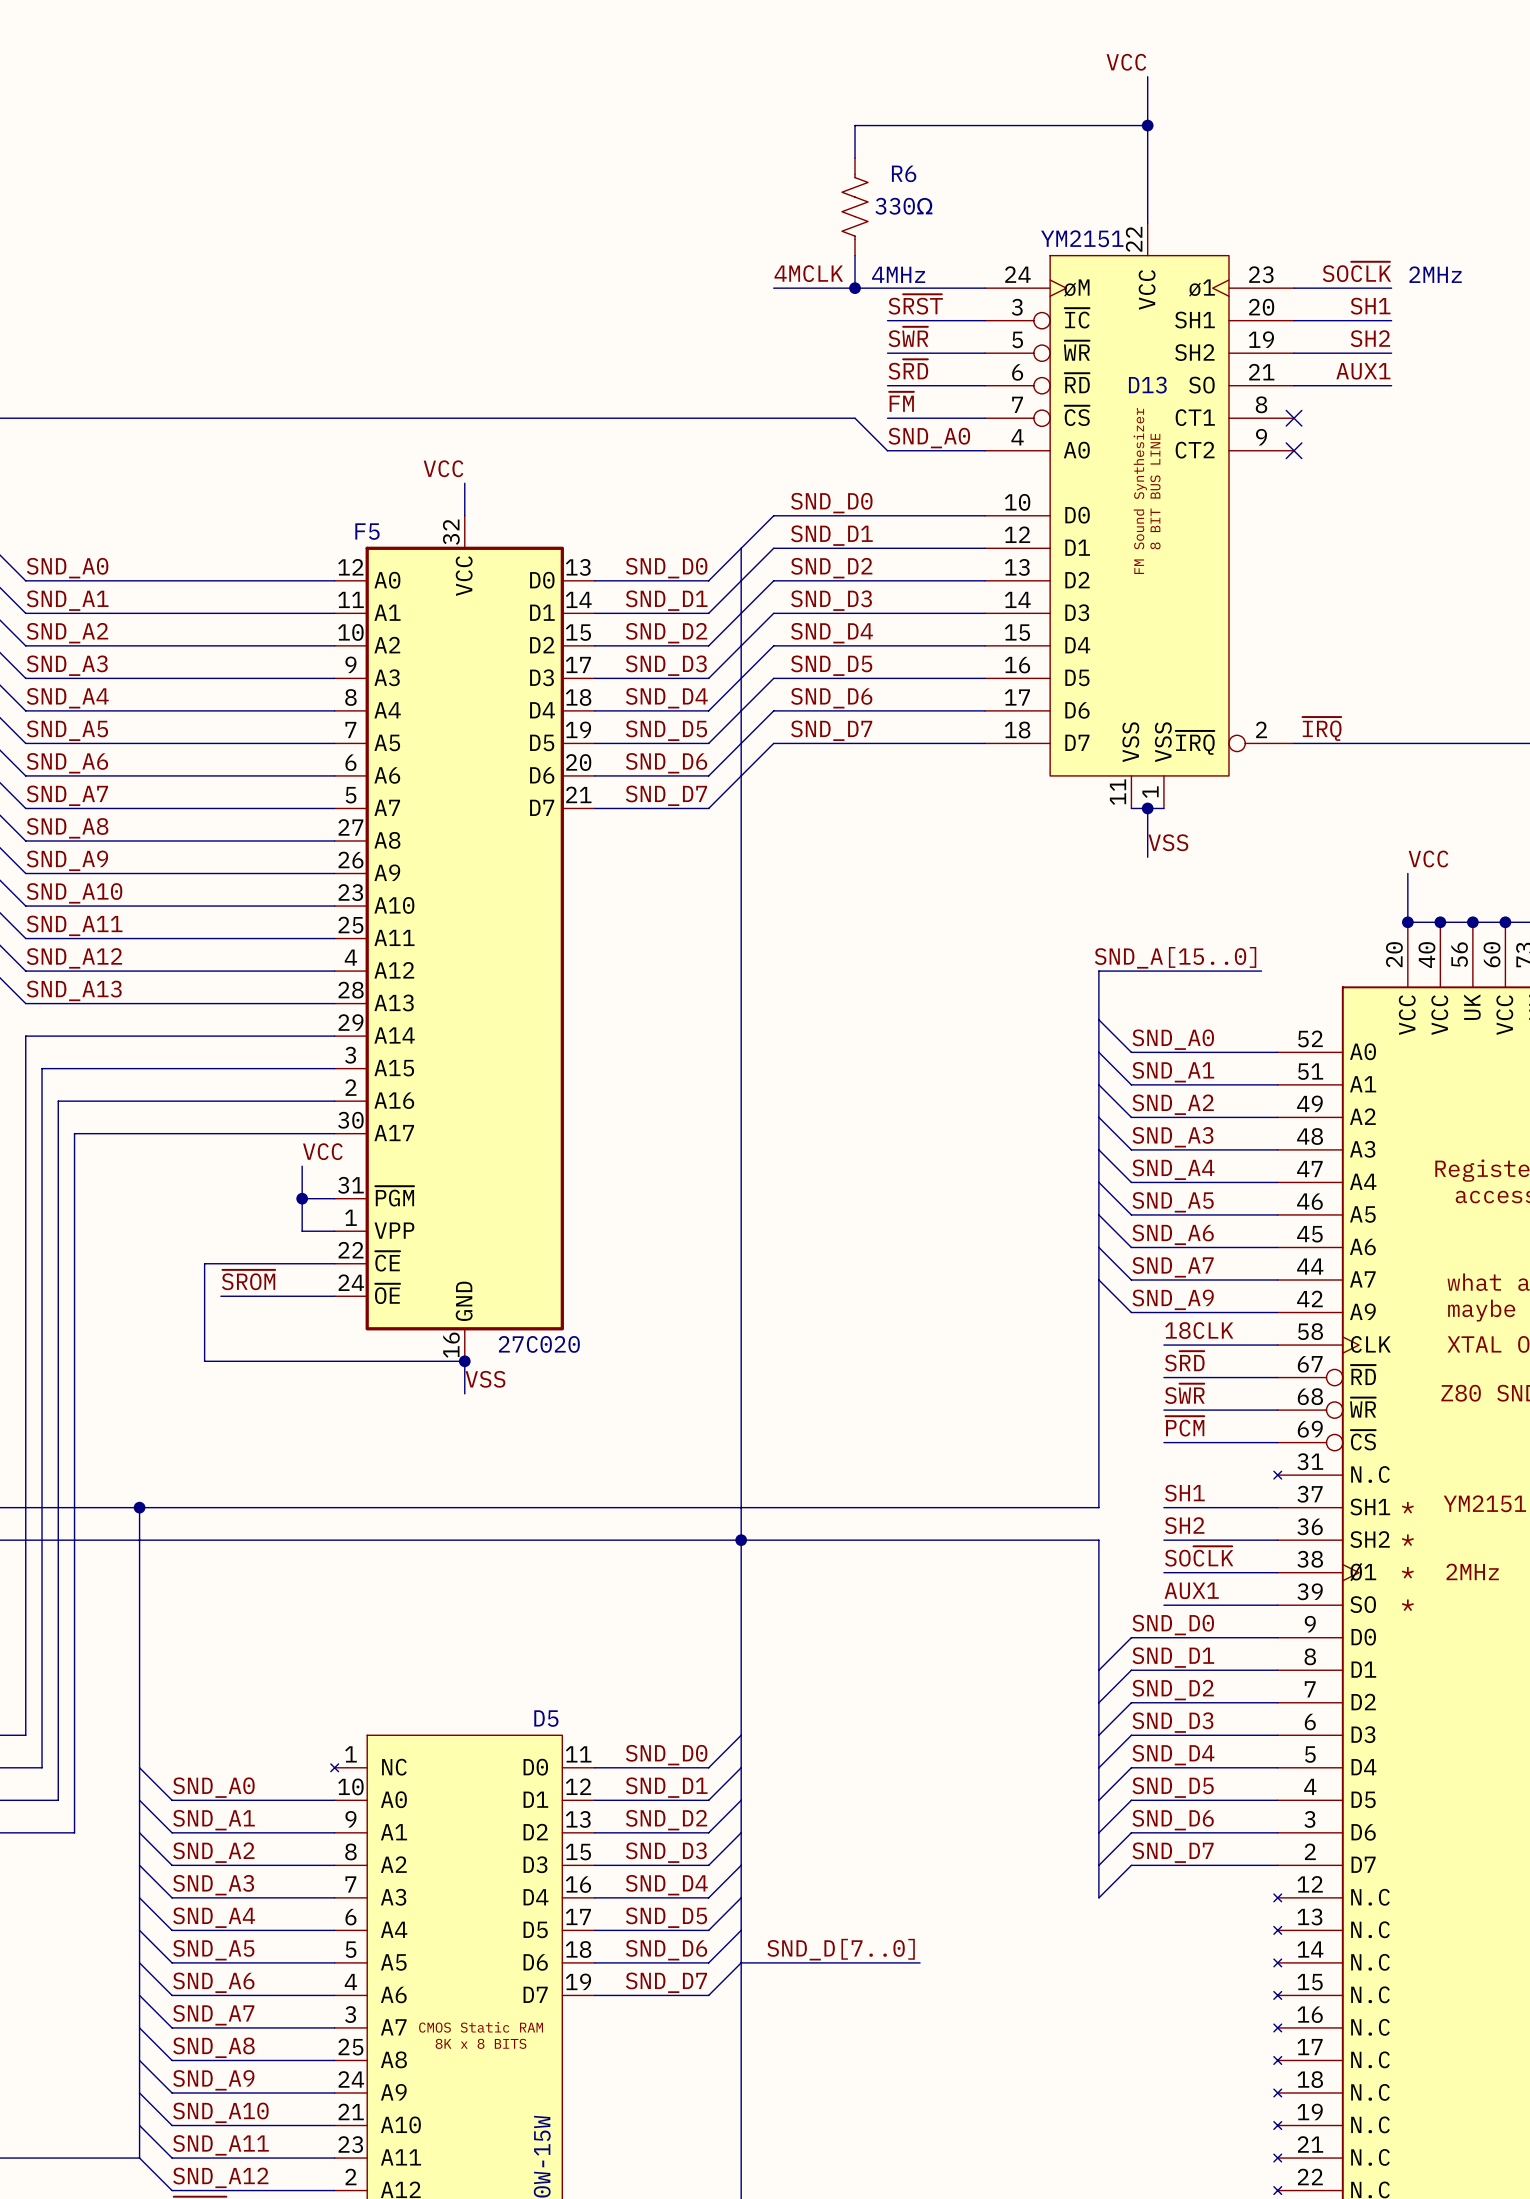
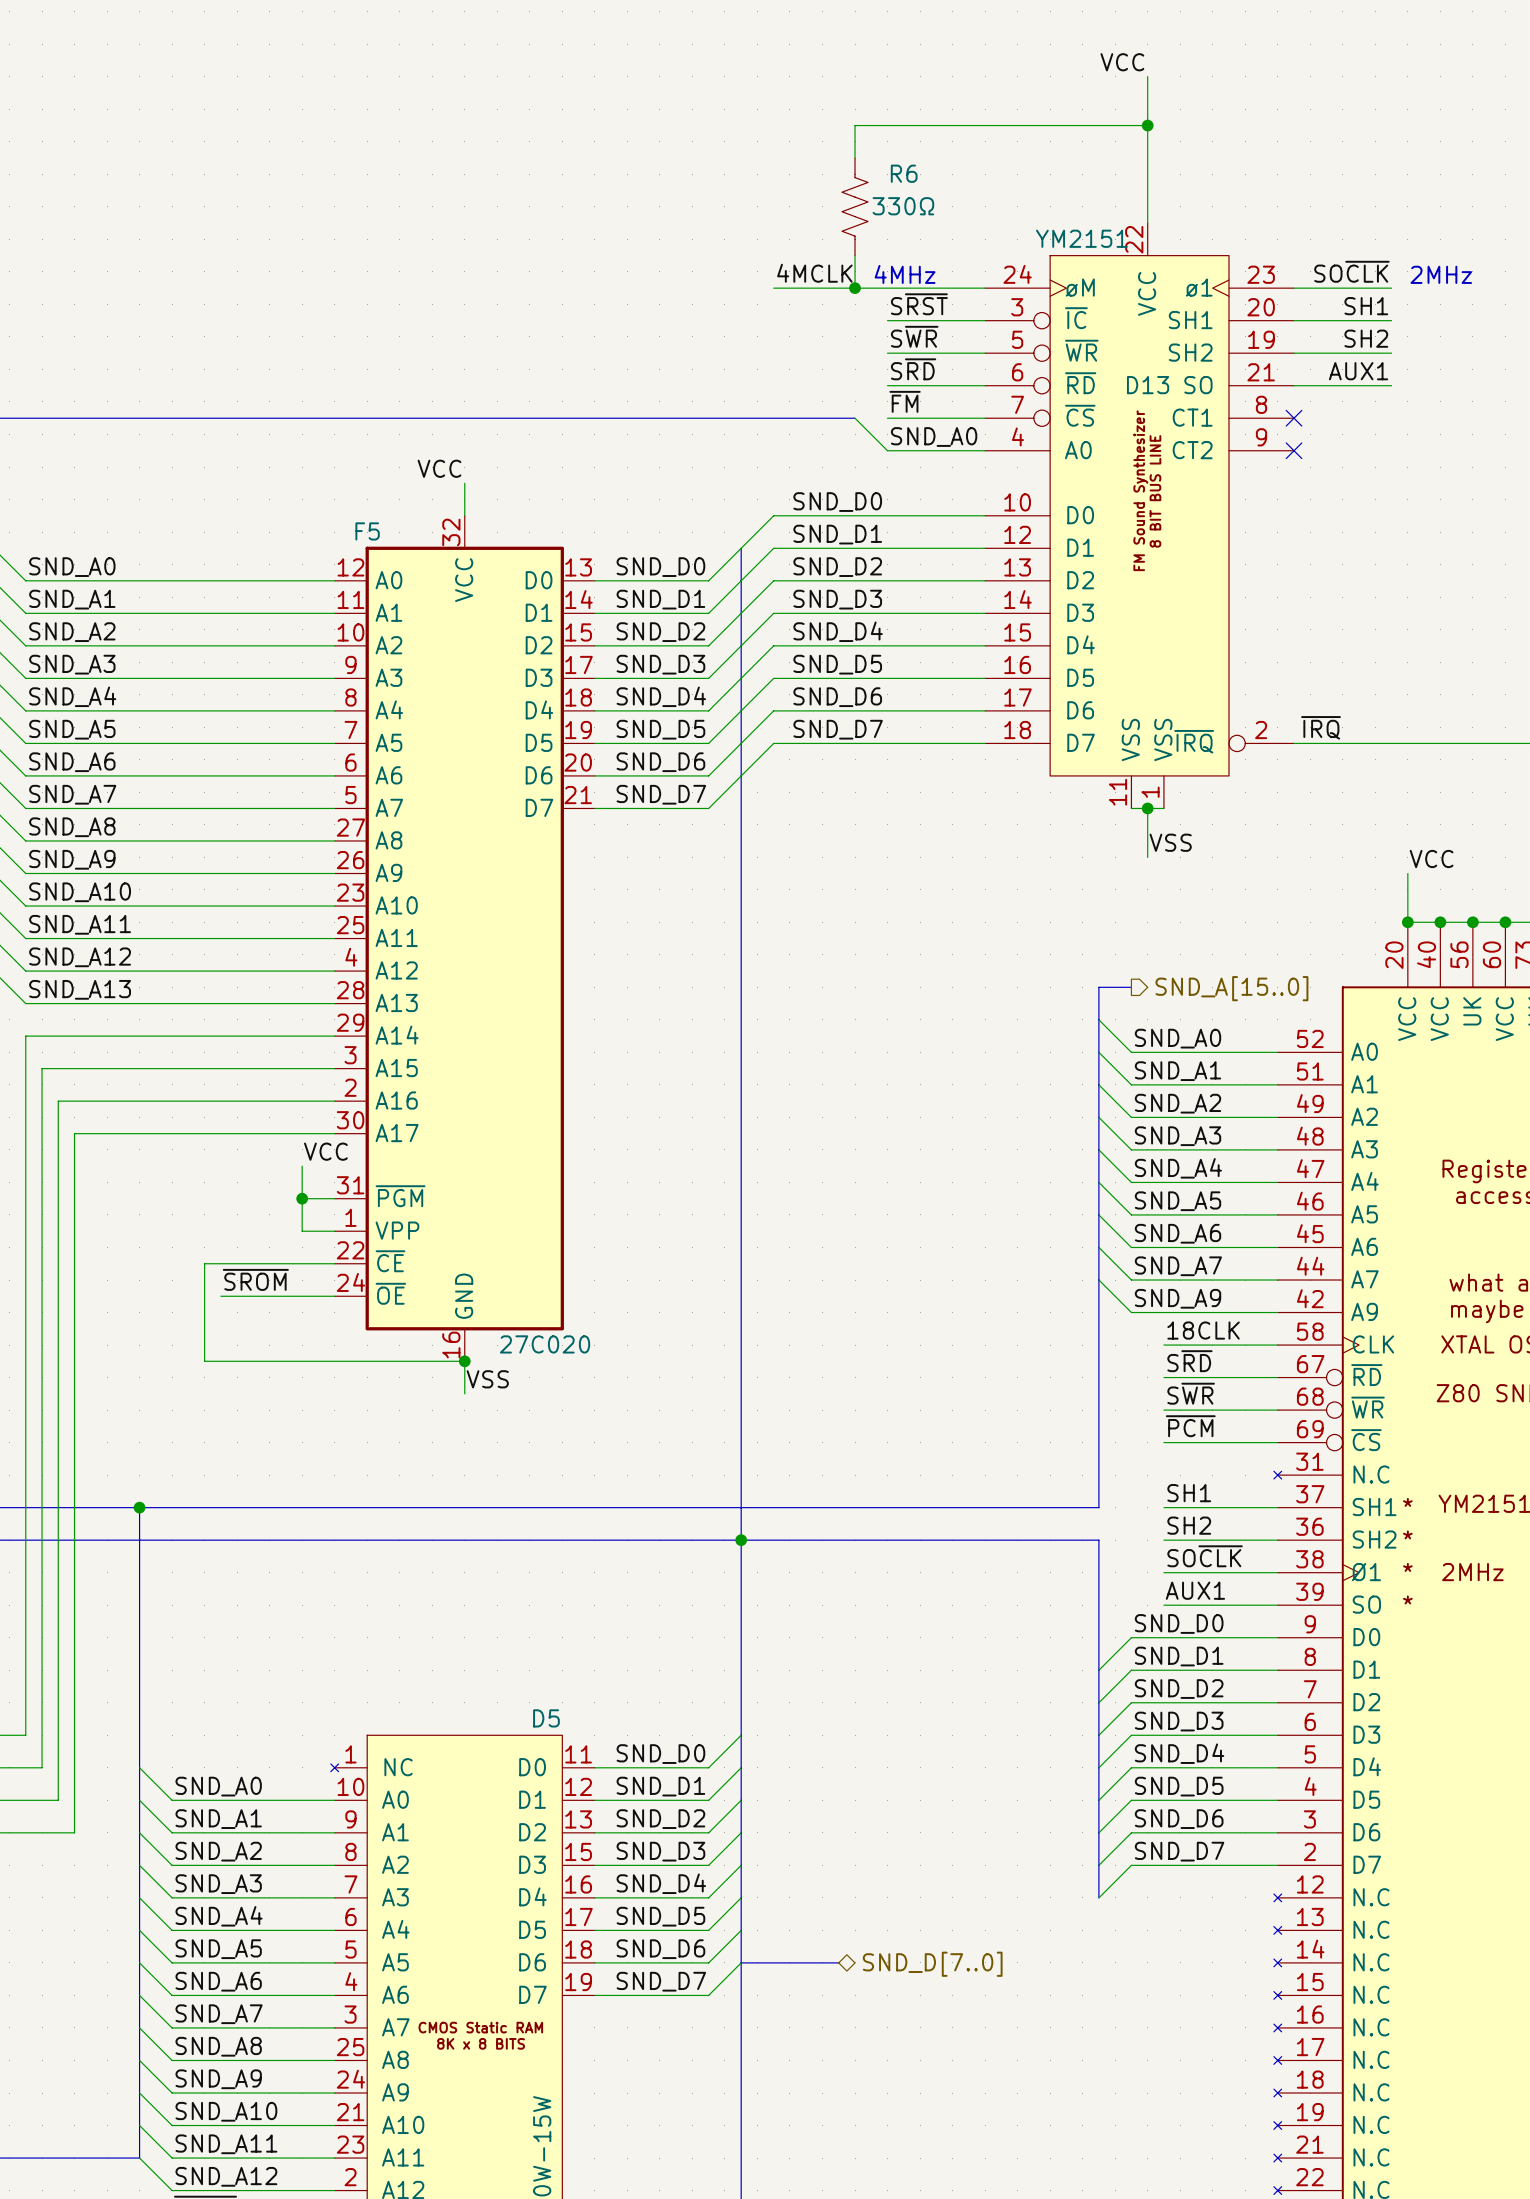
label: SND_A[15..0] (1175, 957) -> none
bus: (1261, 971) (1098, 971) (1098, 987) -> (1131, 987) (1098, 987)
hierarchical label: none -> SND_A[15..0] (1231, 988)
label: SND_D[7..0] (841, 1949) -> none
bus: (838, 1962) (920, 1962) -> none
hierarchical label: none -> SND_D[7..0] (932, 1964)

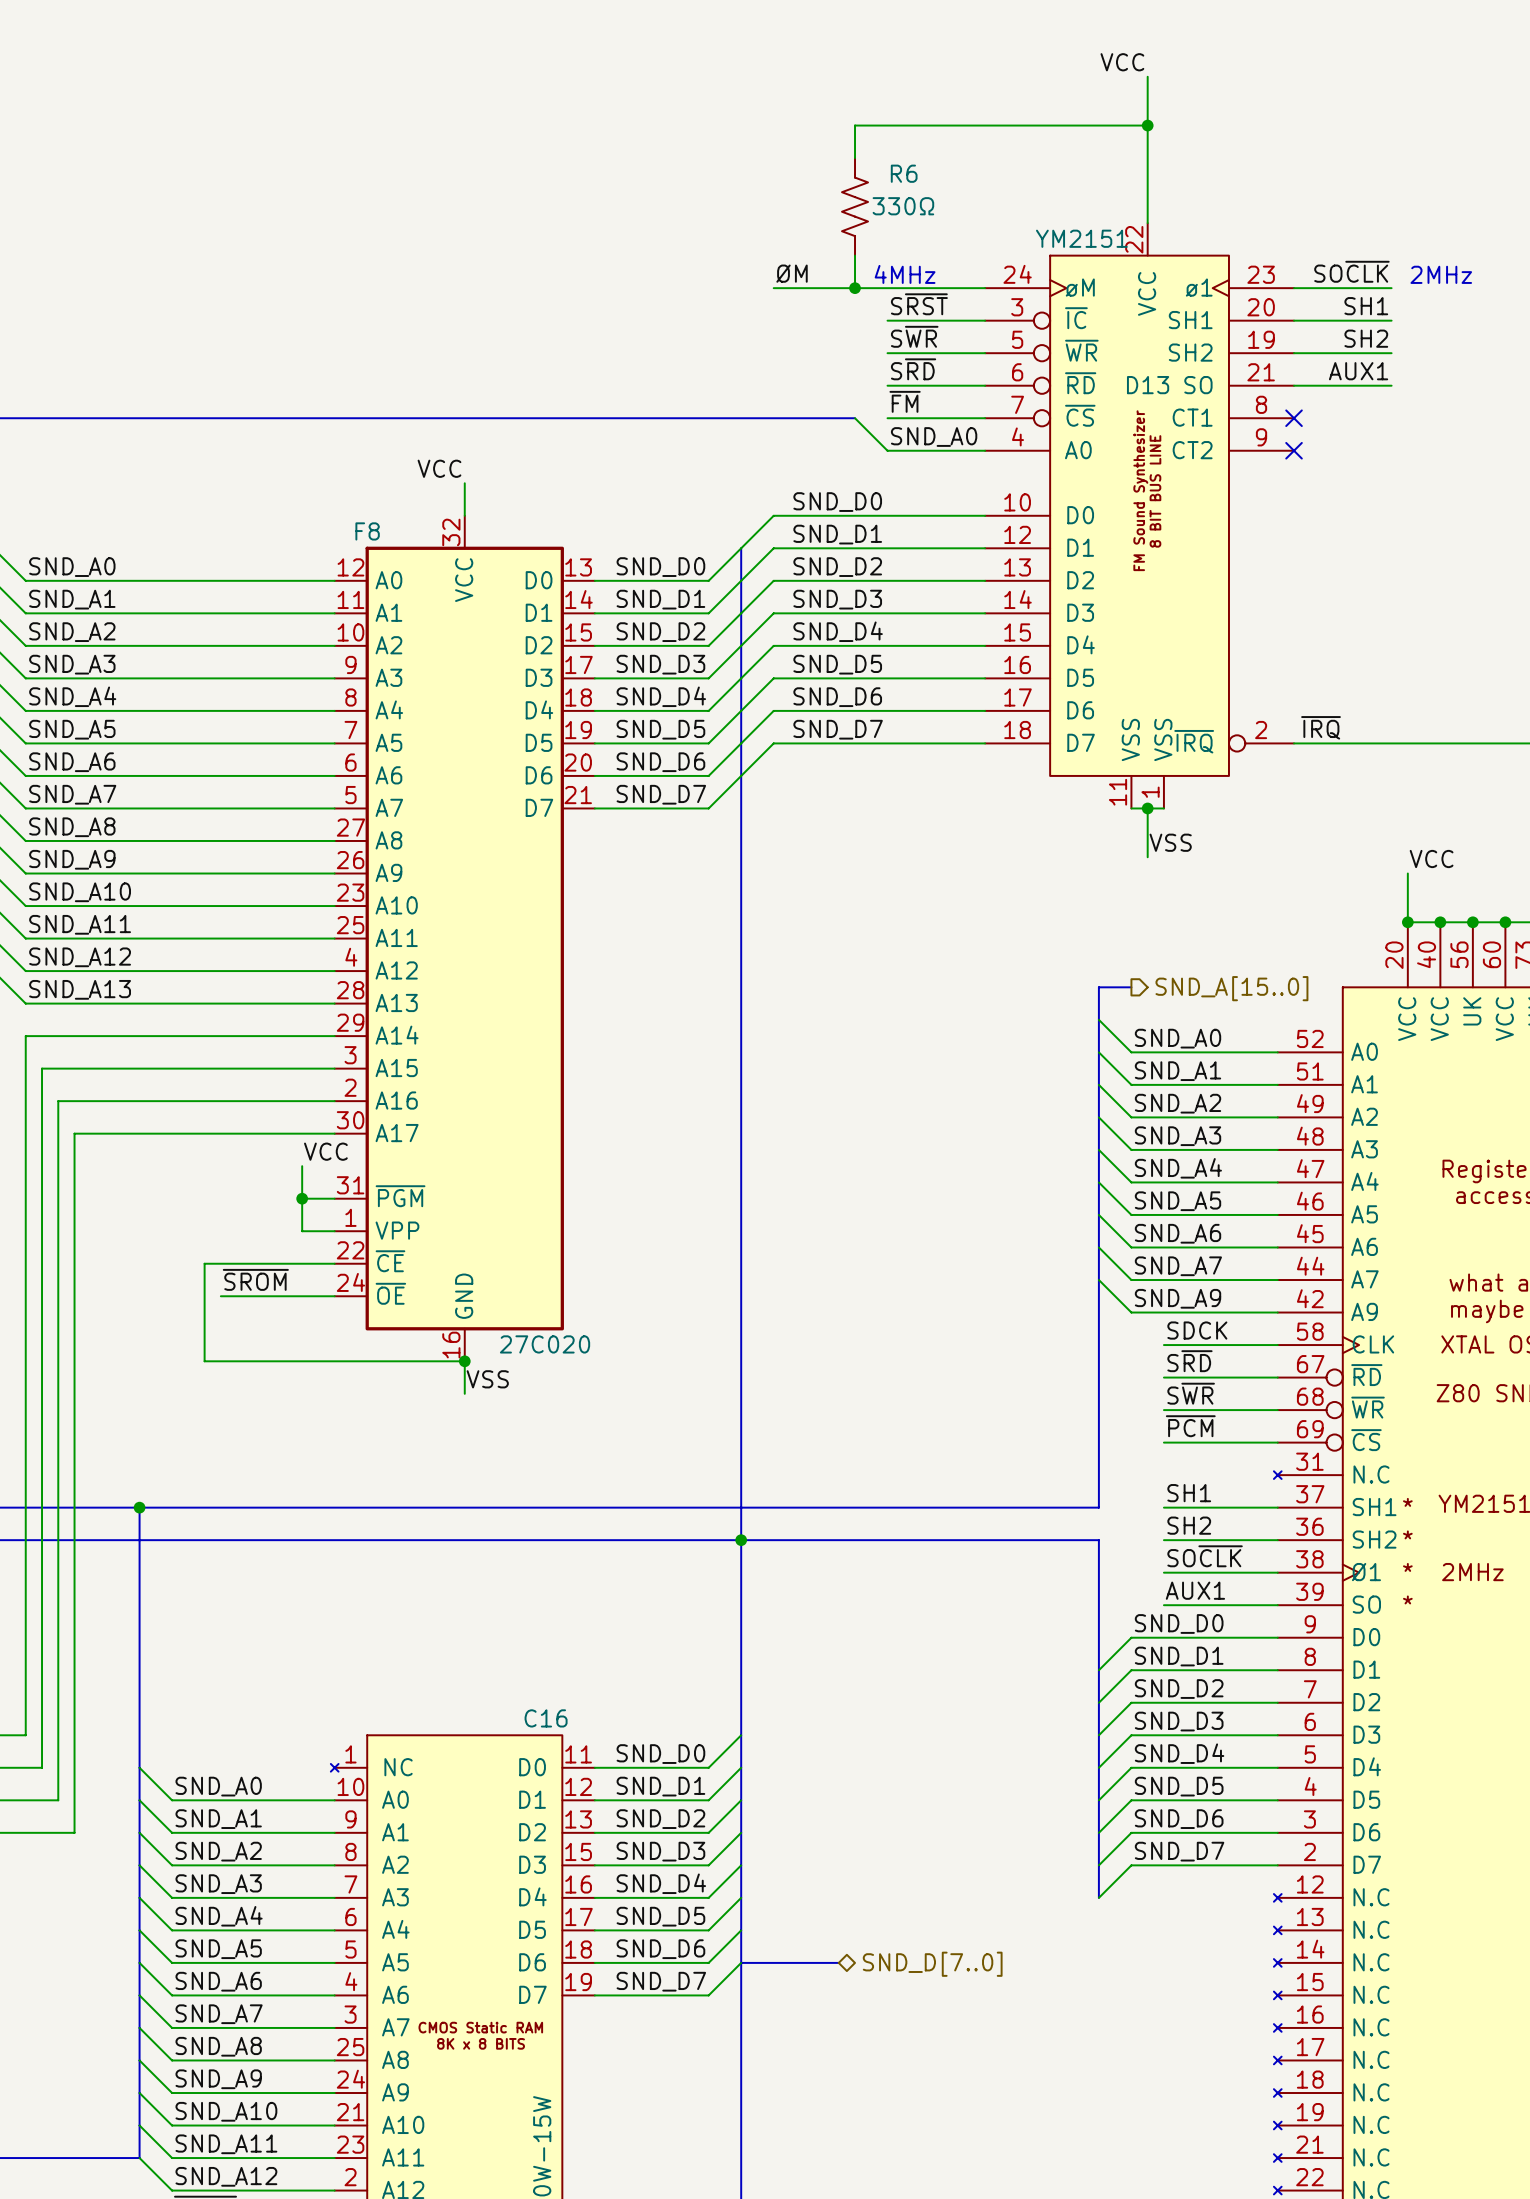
label: 4MCLK (814, 273) -> ØM (792, 273)
F5 name: F5 (367, 531) -> F8 (367, 531)
label: 18CLK (1203, 1330) -> SDCK (1197, 1330)
D5 name: D5 (546, 1718) -> C16 (546, 1718)

